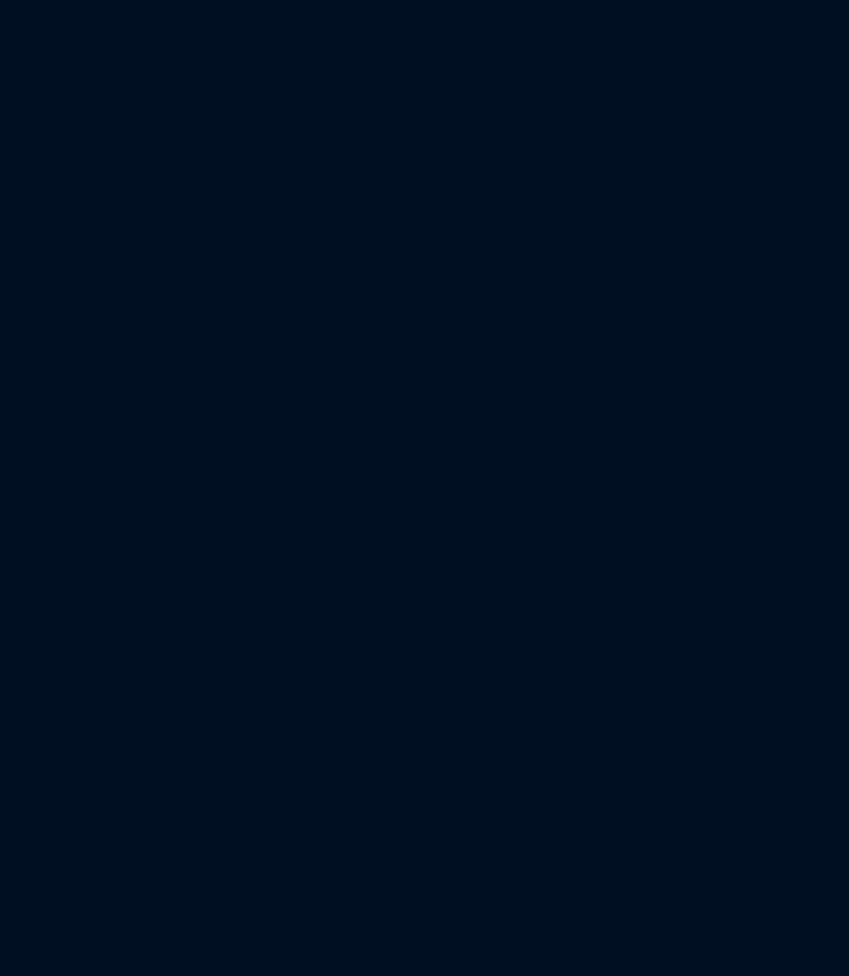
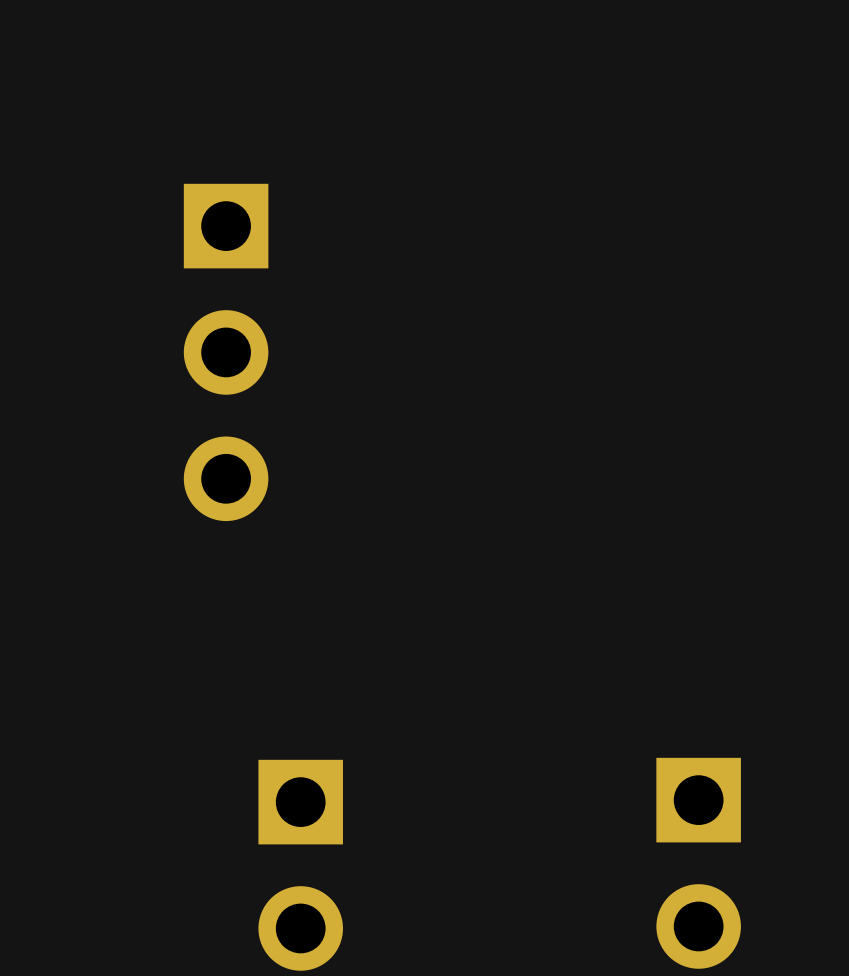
part: none -> (226, 352)
part: none -> (698, 863)
part: none -> (300, 865)

